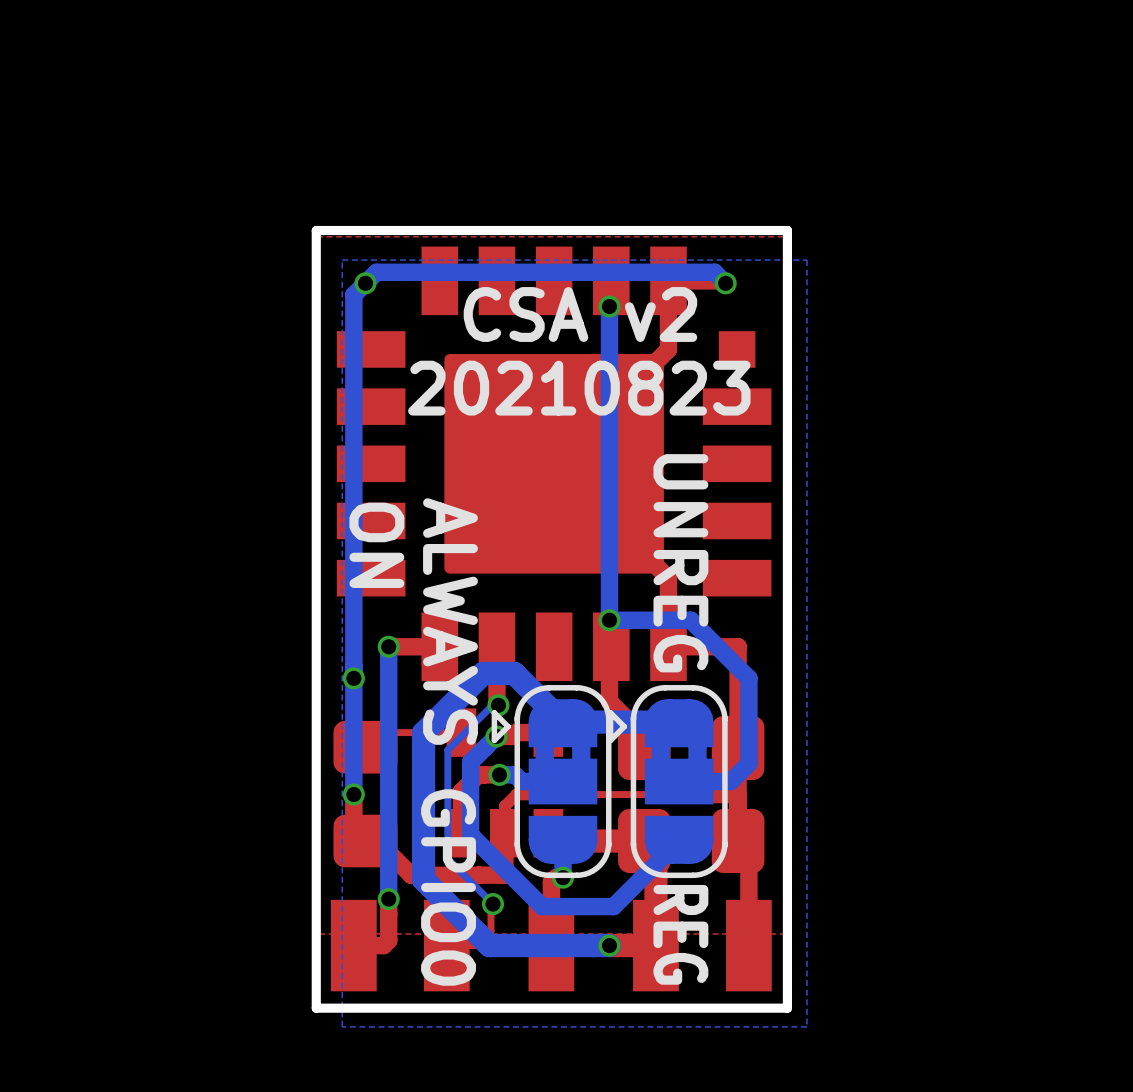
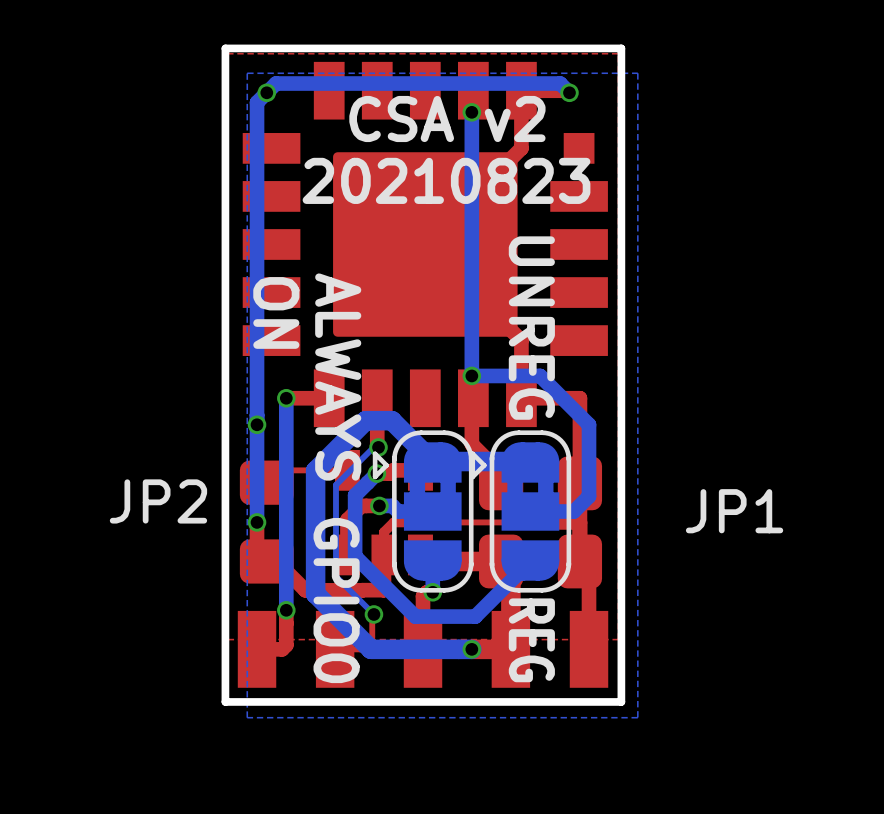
JP2 name: none -> JP2 (158, 501)
JP1 name: none -> JP1 (734, 511)

